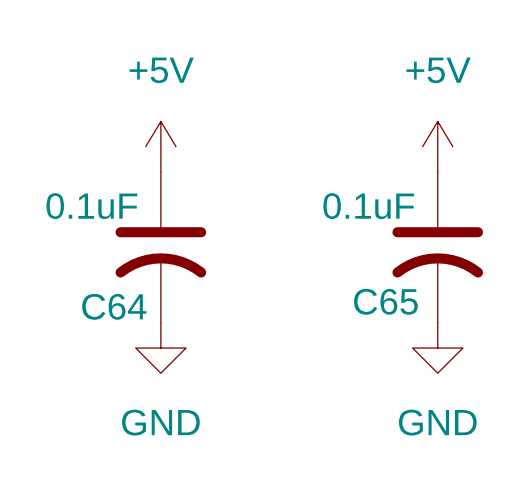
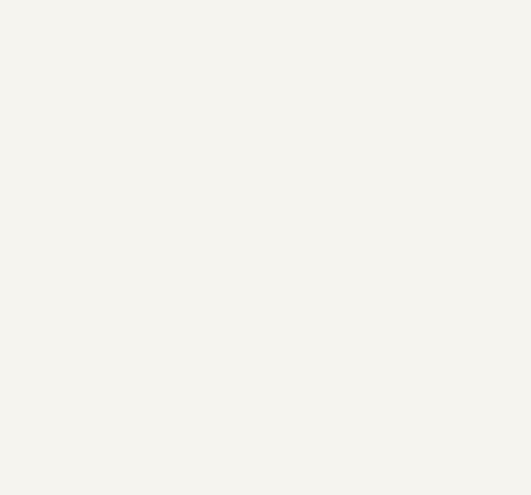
power symbol: +5V (160, 146) -> none
power symbol: +5V (437, 146) -> none
C64: 0.1uF (160, 247) -> none
C65: 0.1uF (437, 247) -> none
power symbol: GND (160, 348) -> none
power symbol: GND (437, 348) -> none

